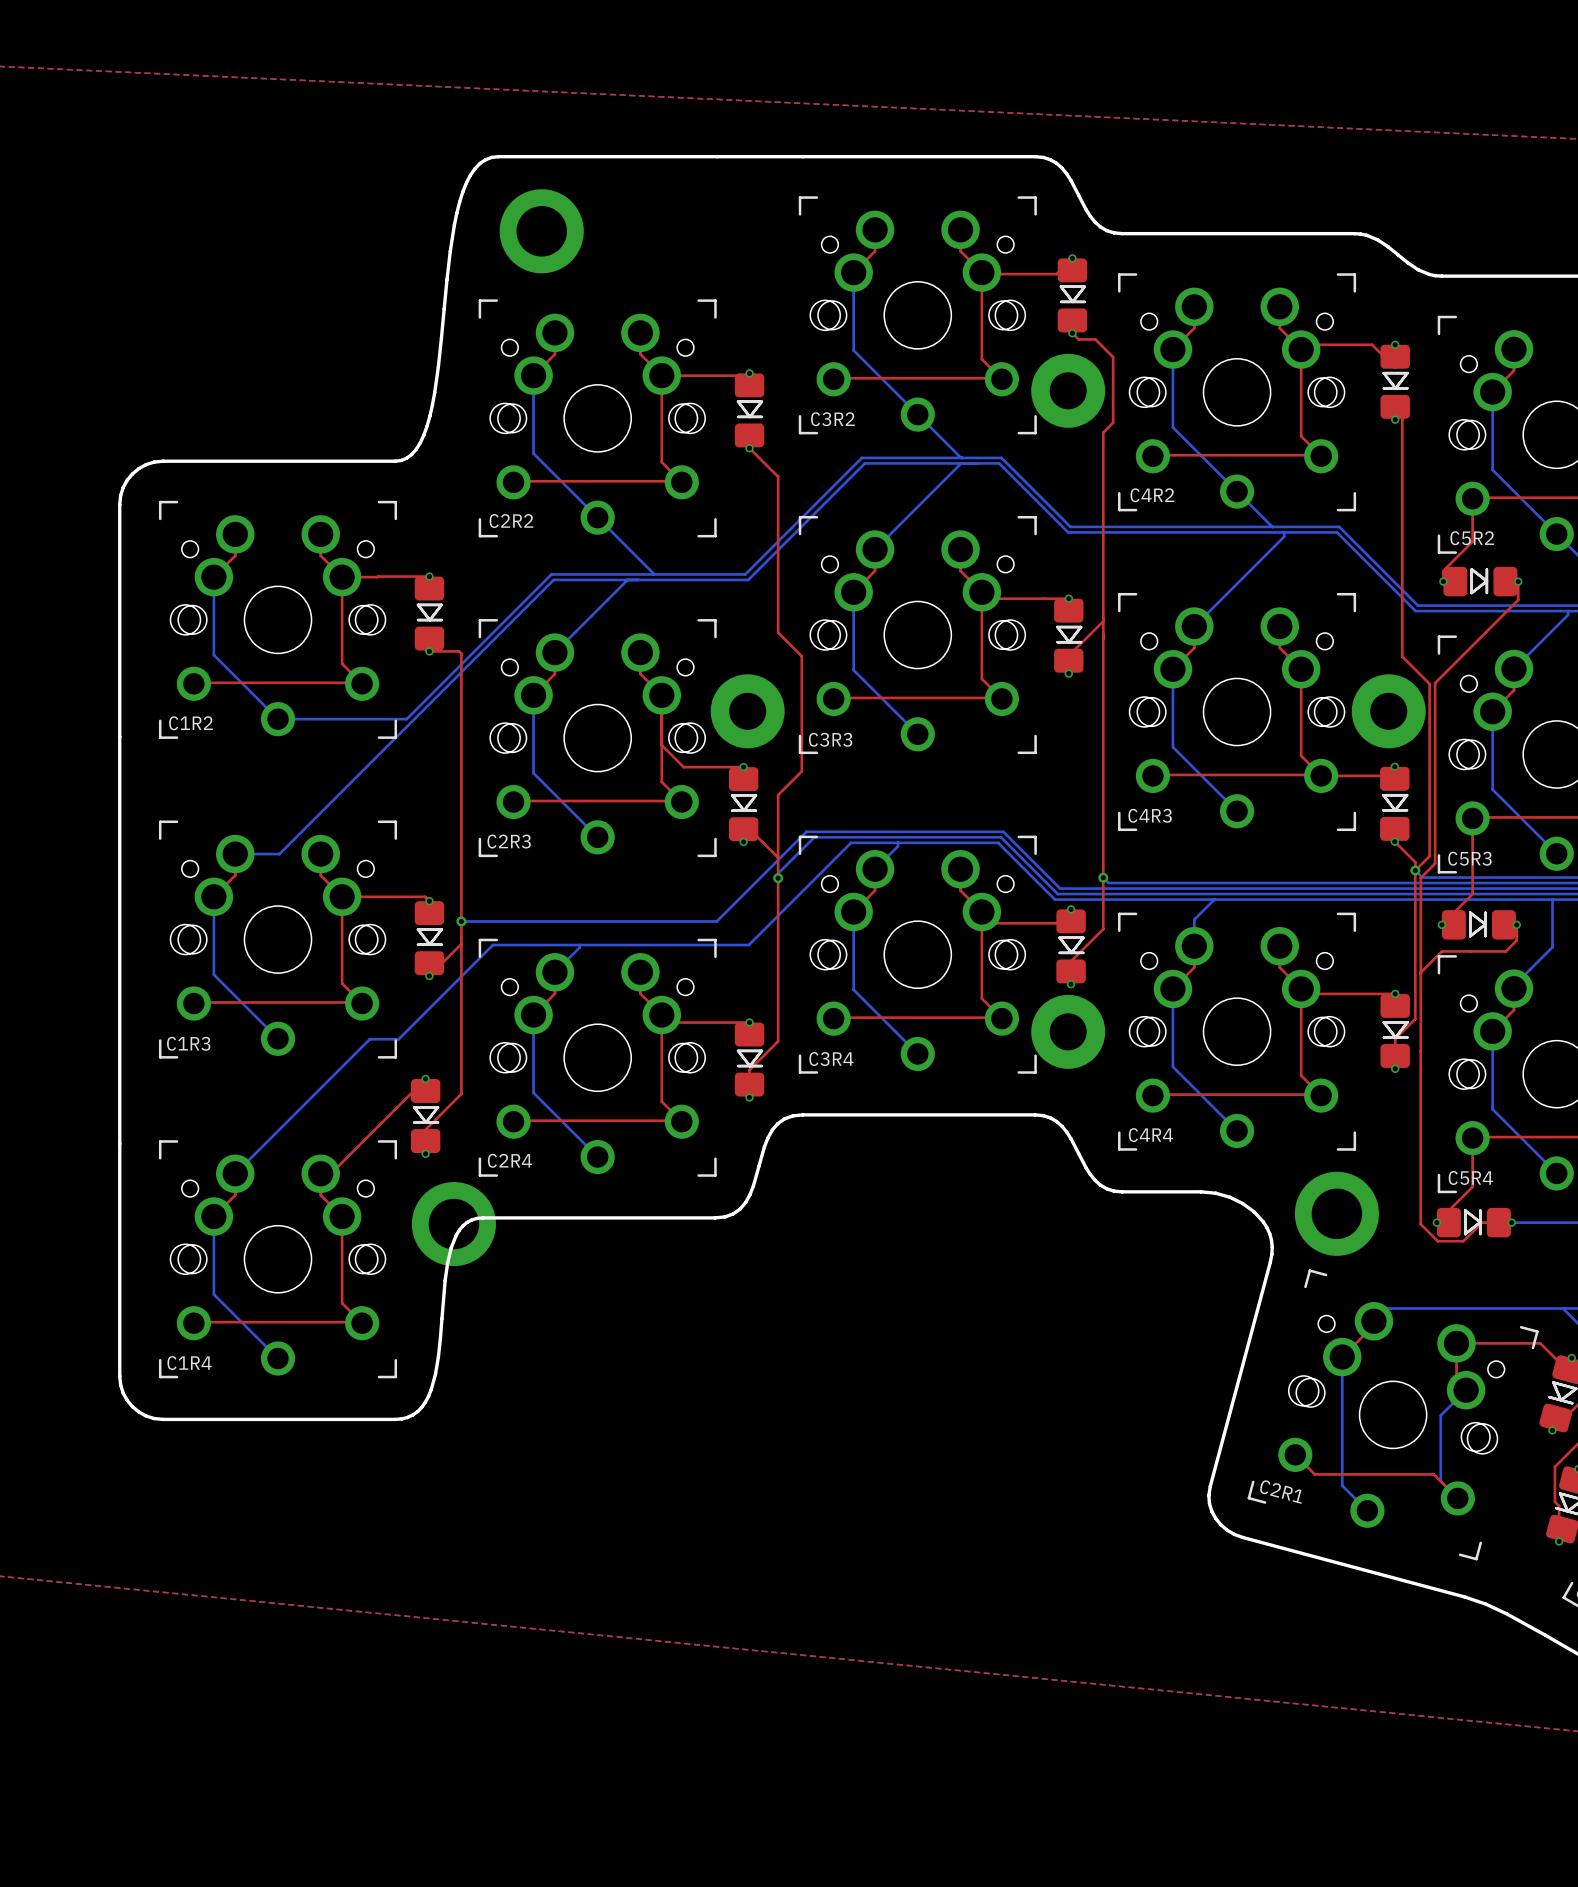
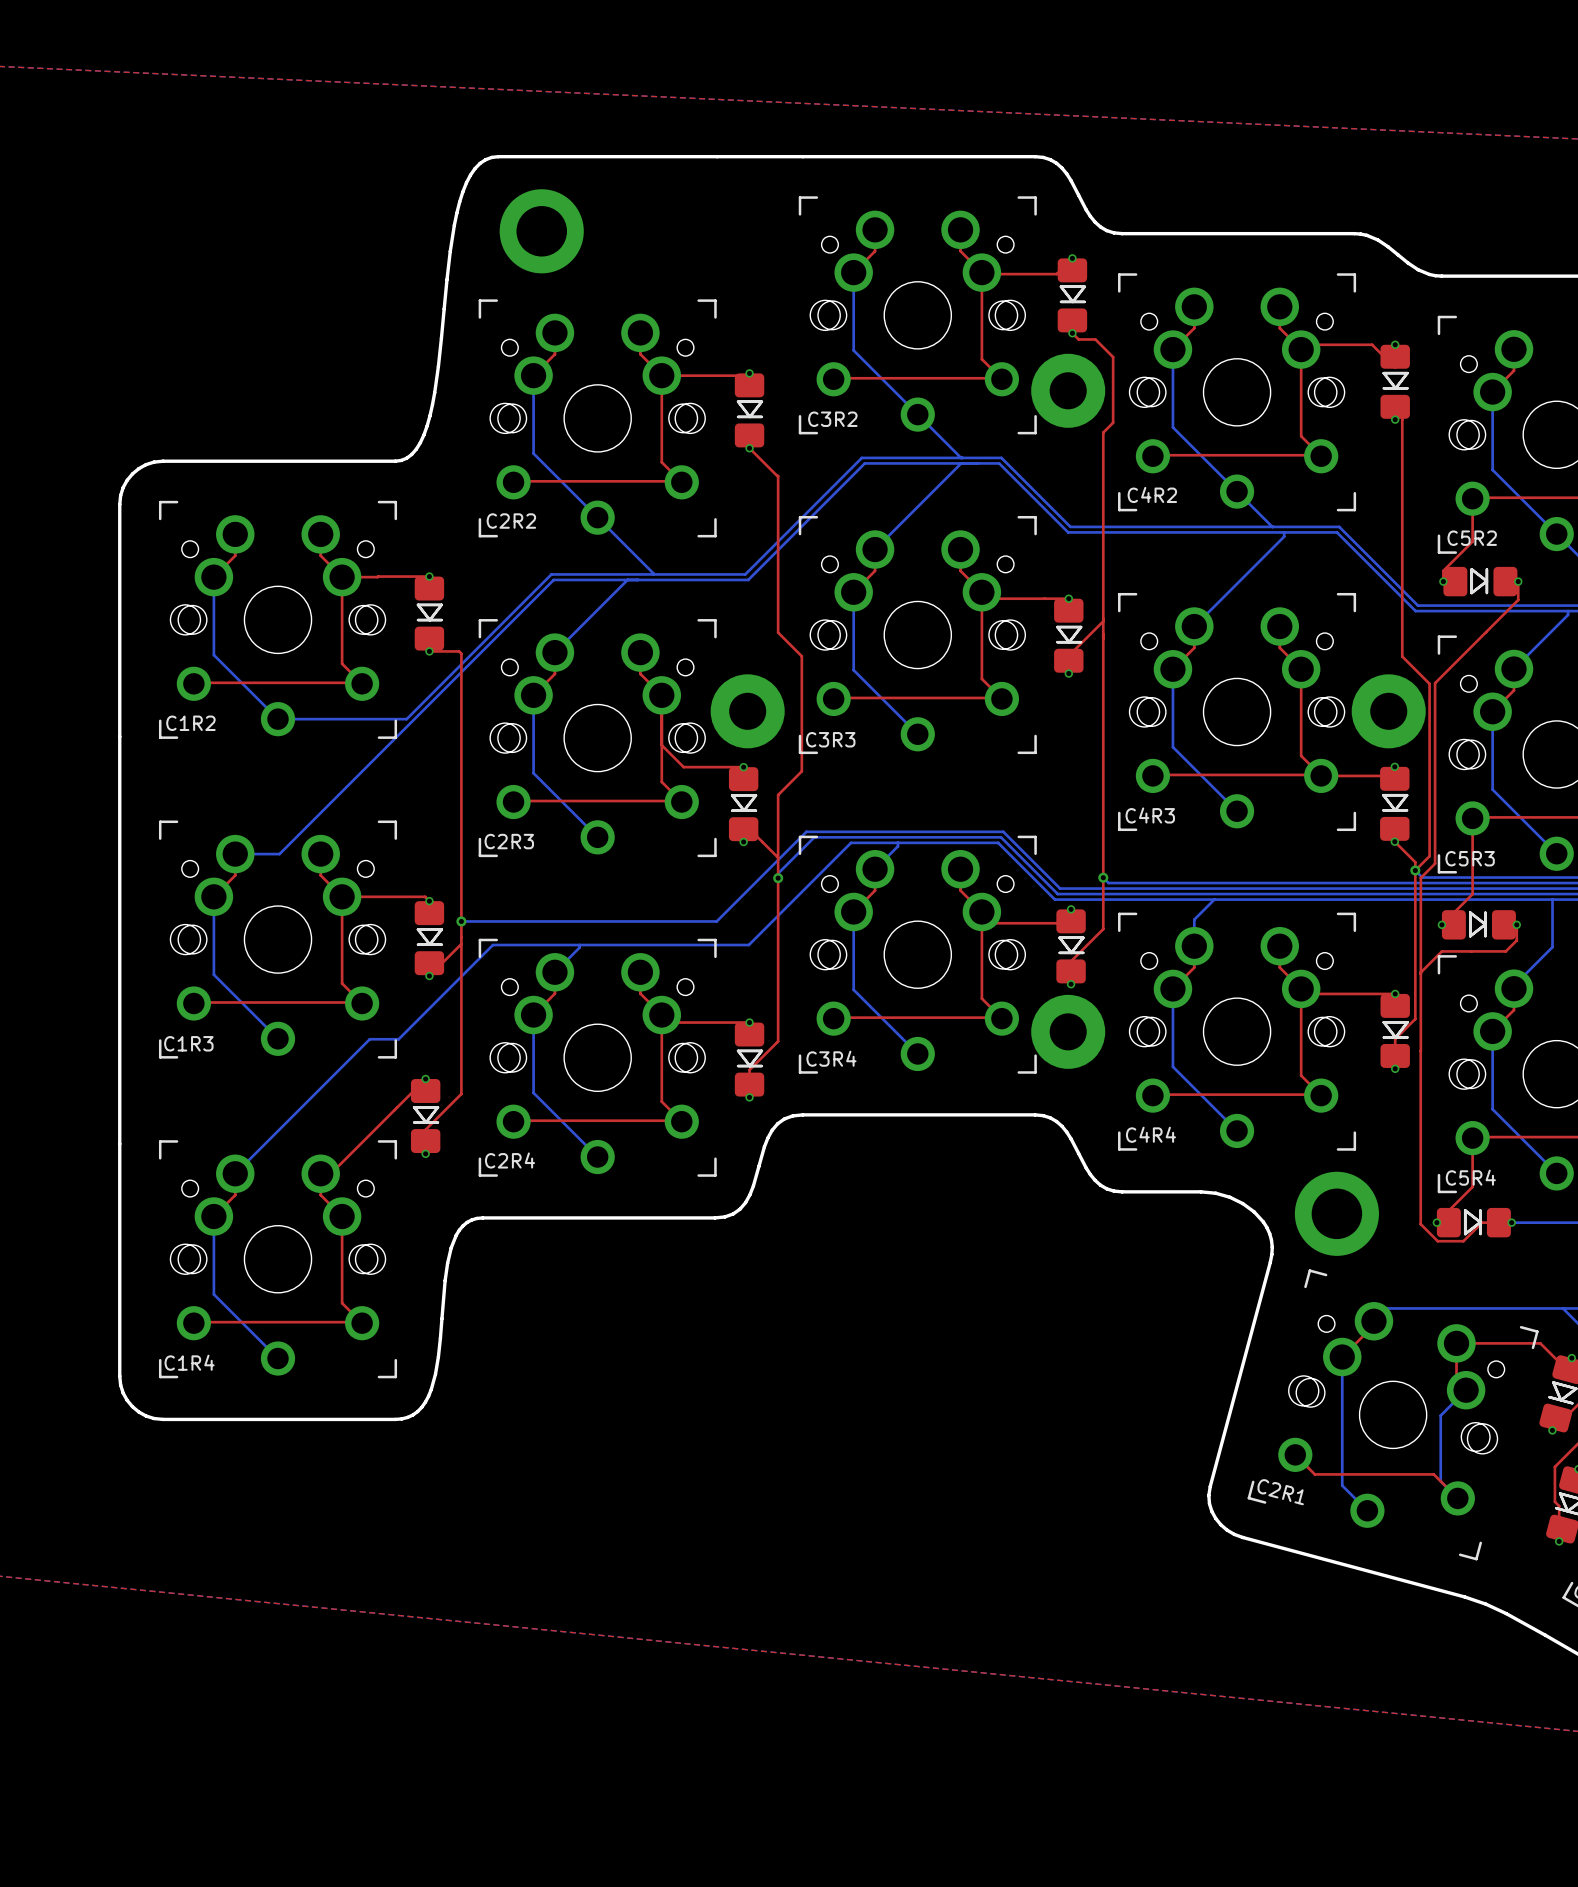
part: (453, 1224) -> none

